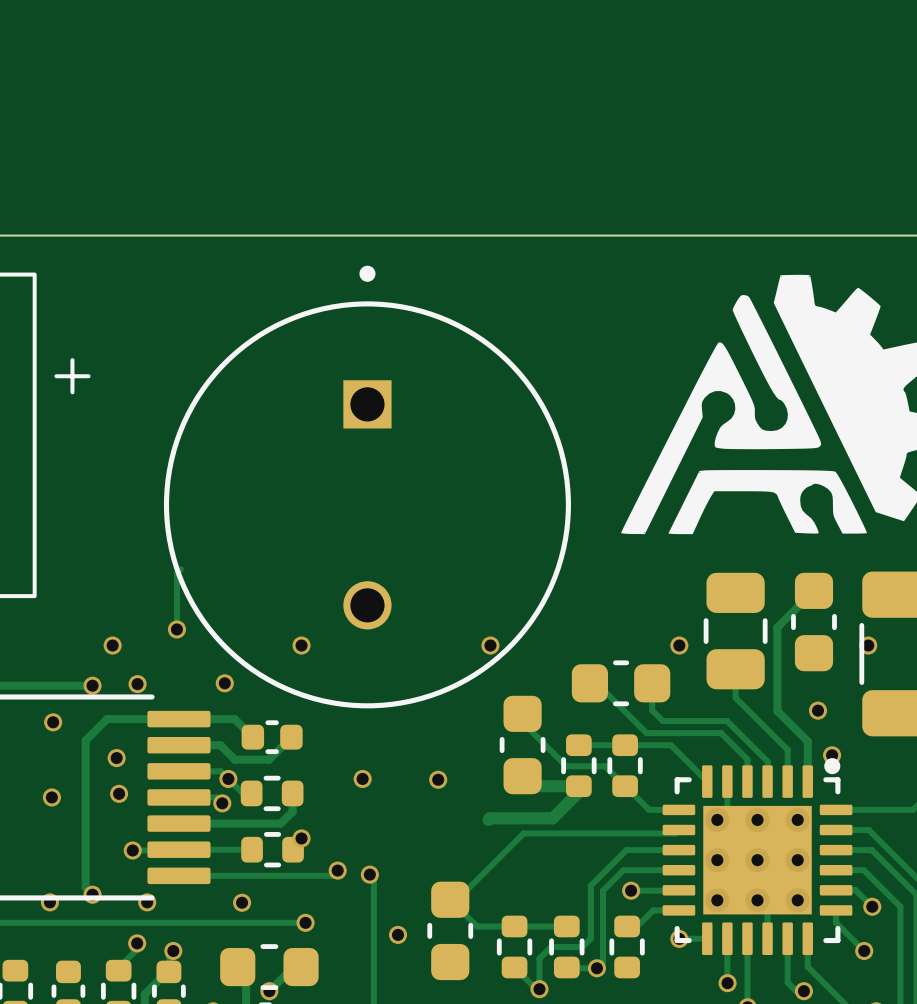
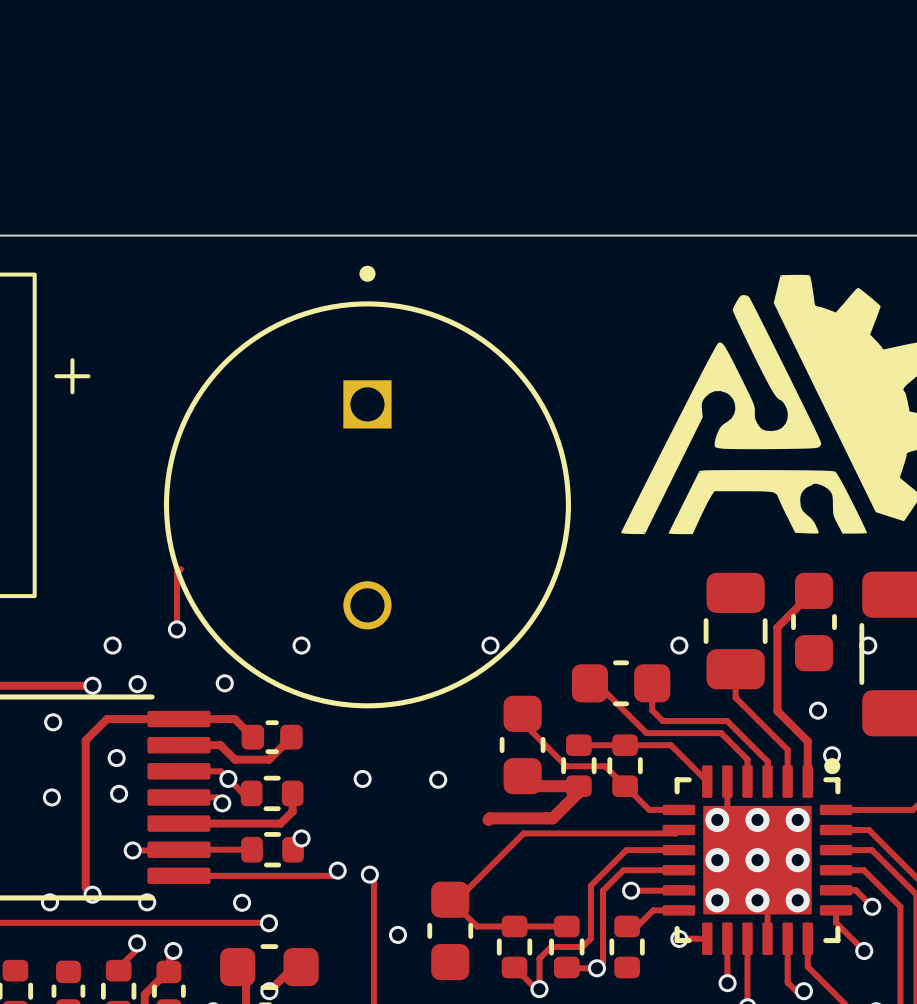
track: (268, 922) (305, 922) -> none
via position: (305, 922) -> (268, 923)

